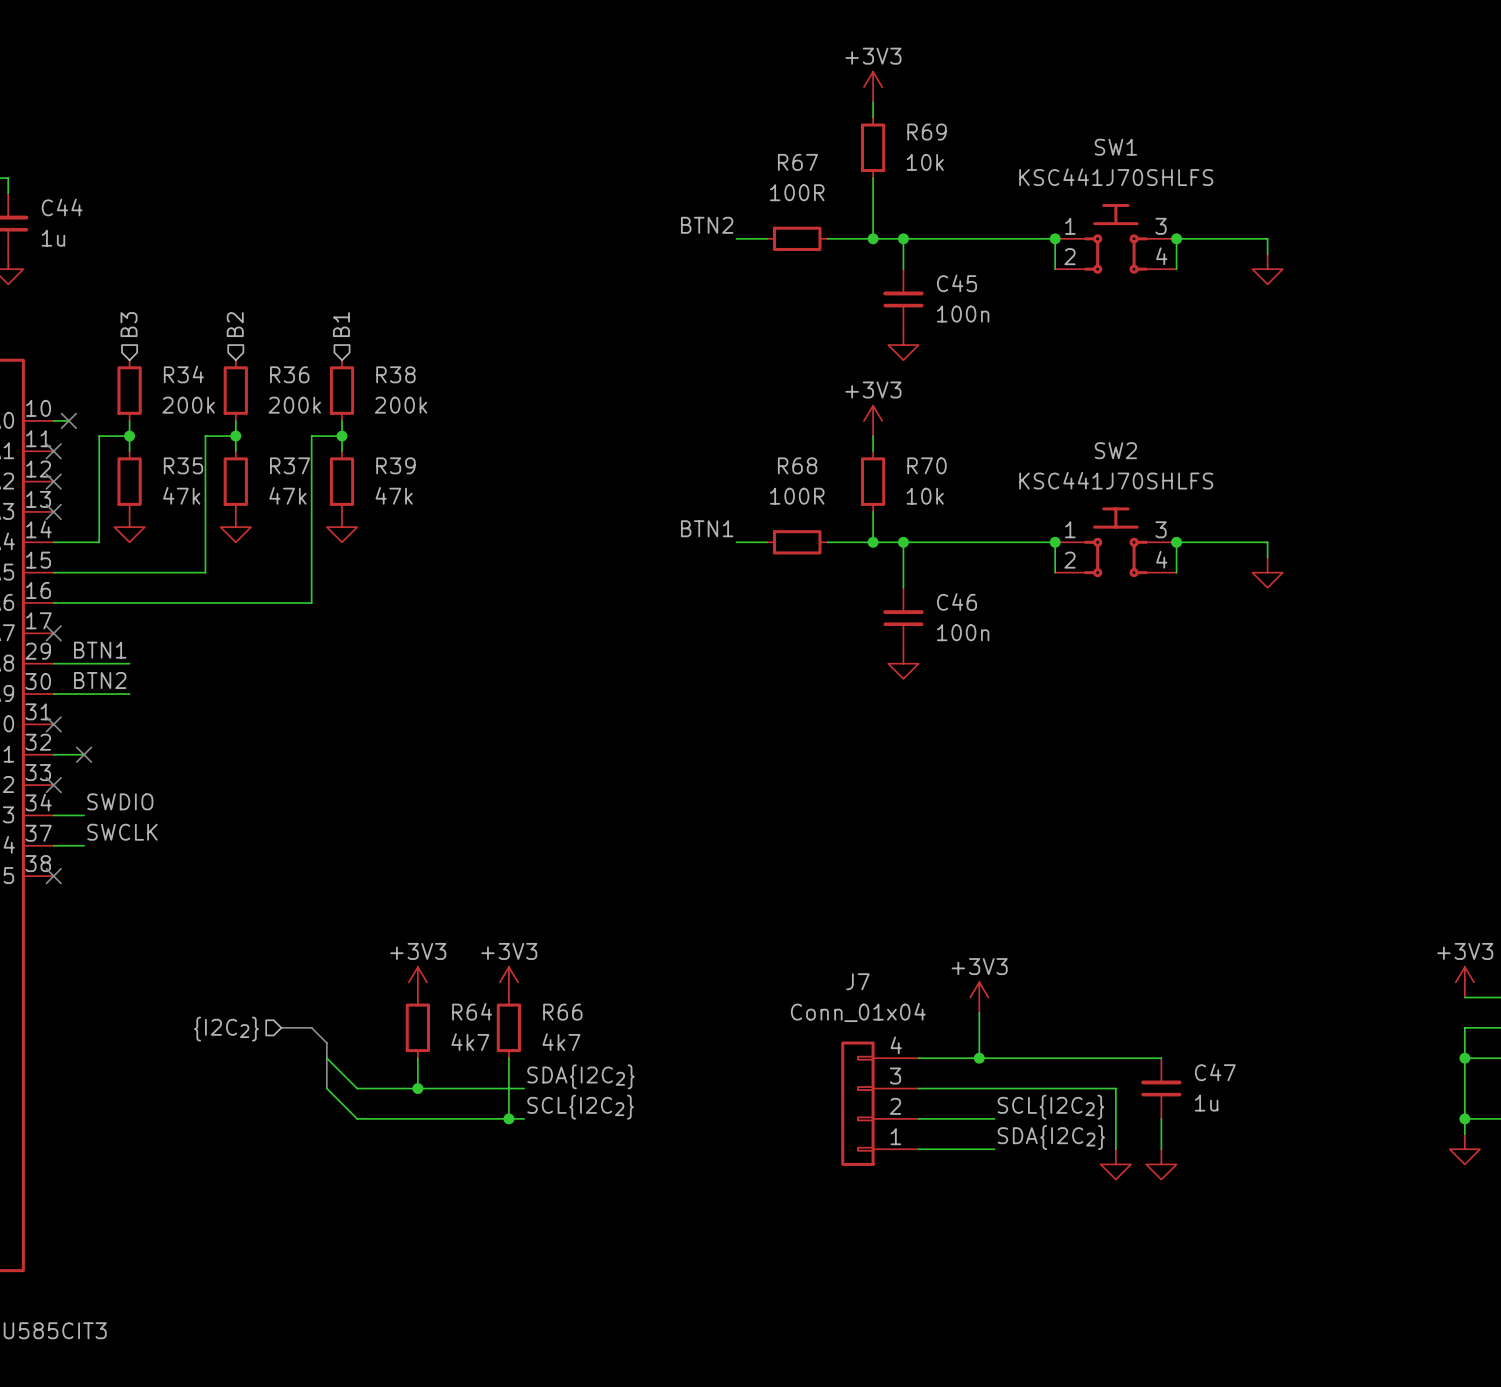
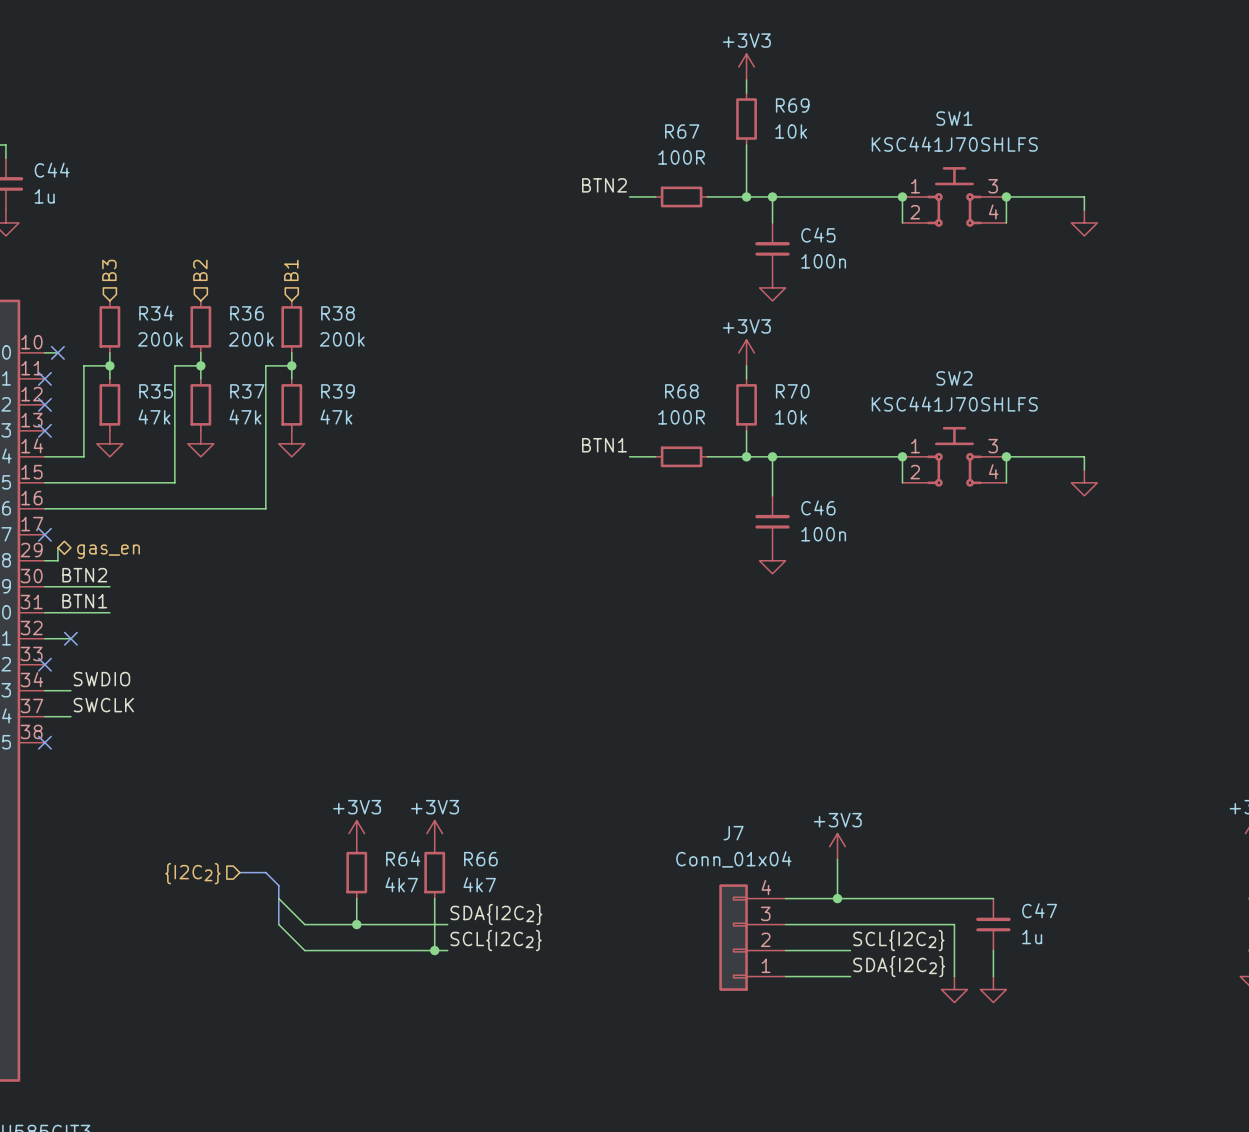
label position: BTN1 (100, 650) -> BTN1 (84, 601)
hierarchical label: none -> gas_en (108, 551)
wire: (68, 663) (129, 663) -> (57, 560) (57, 547)
wire: none -> (44, 612) (109, 612)
no-connect mark: (53, 724) -> none

